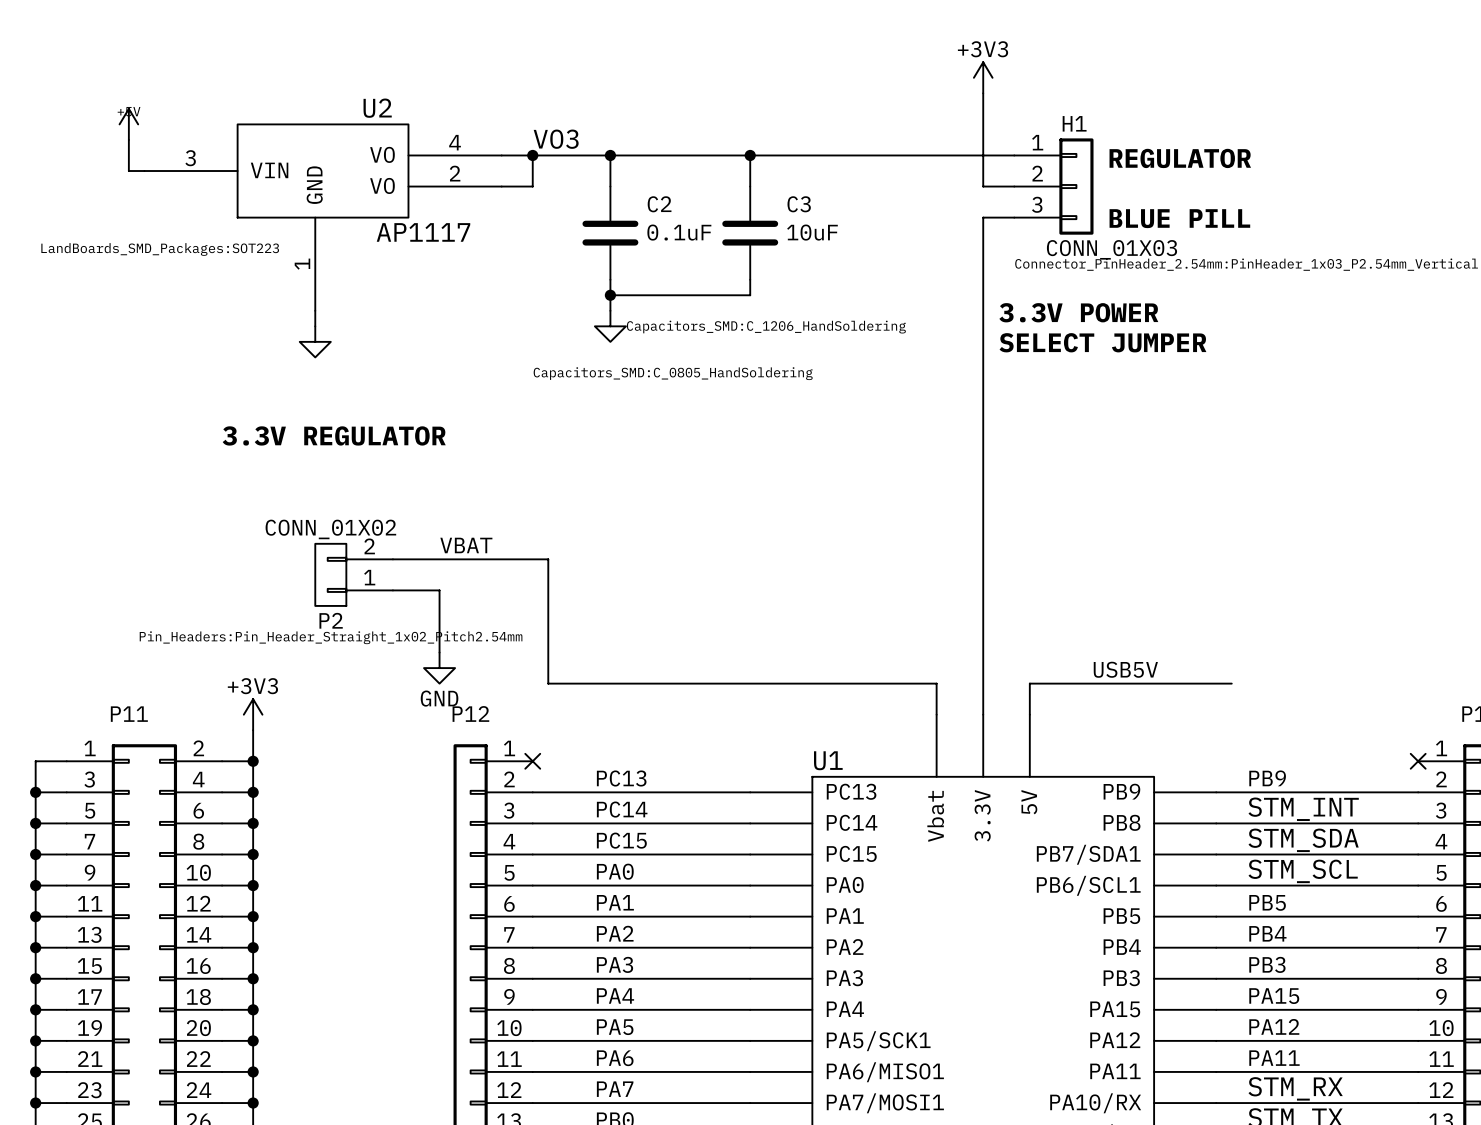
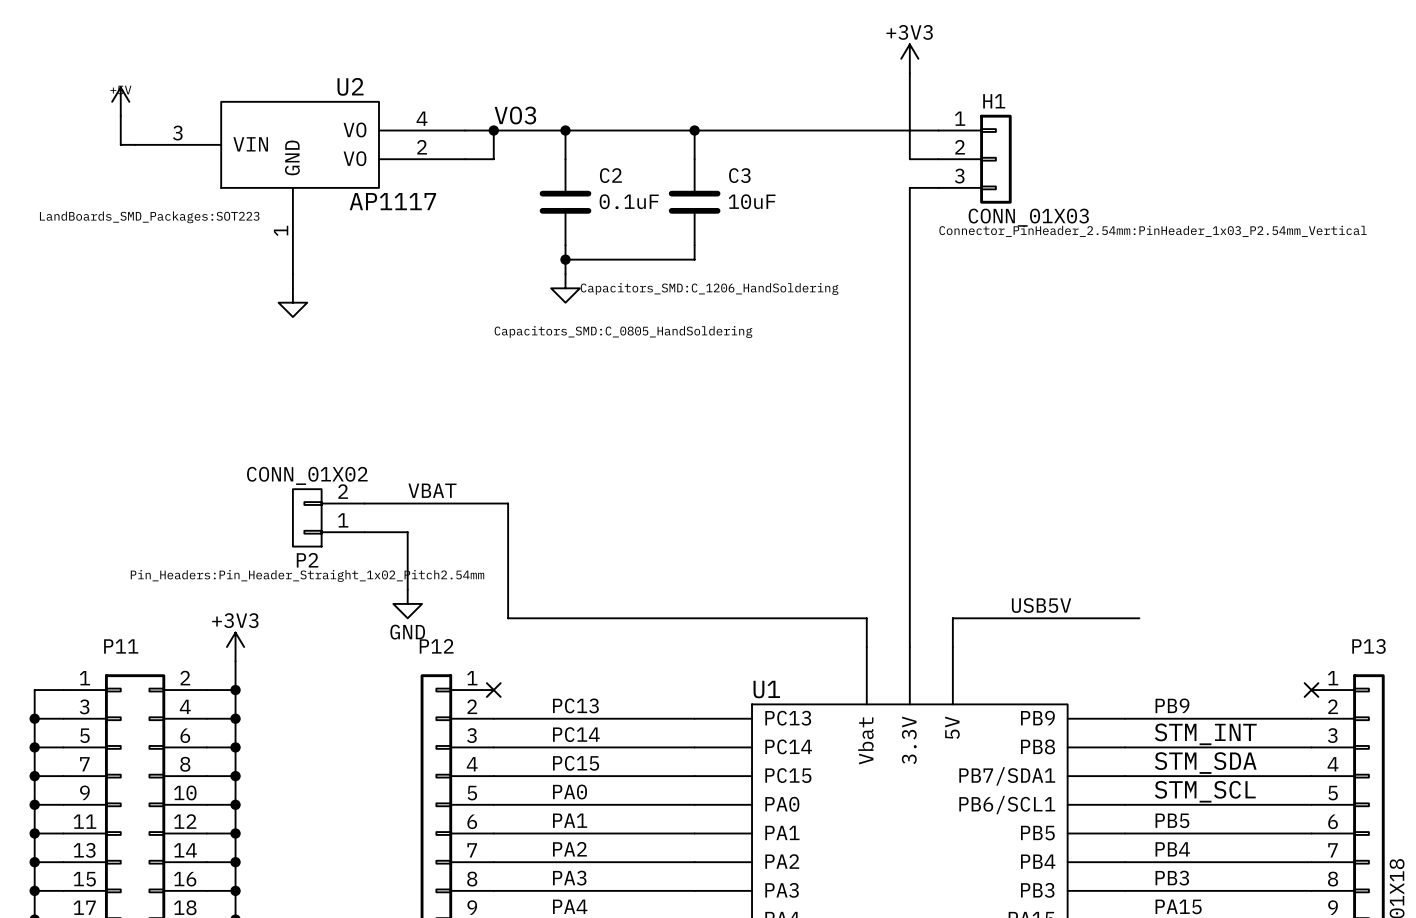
text: REGULATOR (1180, 158) -> none
text: BLUE PILL (1179, 218) -> none
text: 3.3V POWER (1078, 312) -> none
text: SELECT JUMPER (1102, 342) -> none
text: 3.3V REGULATOR (334, 435) -> none

